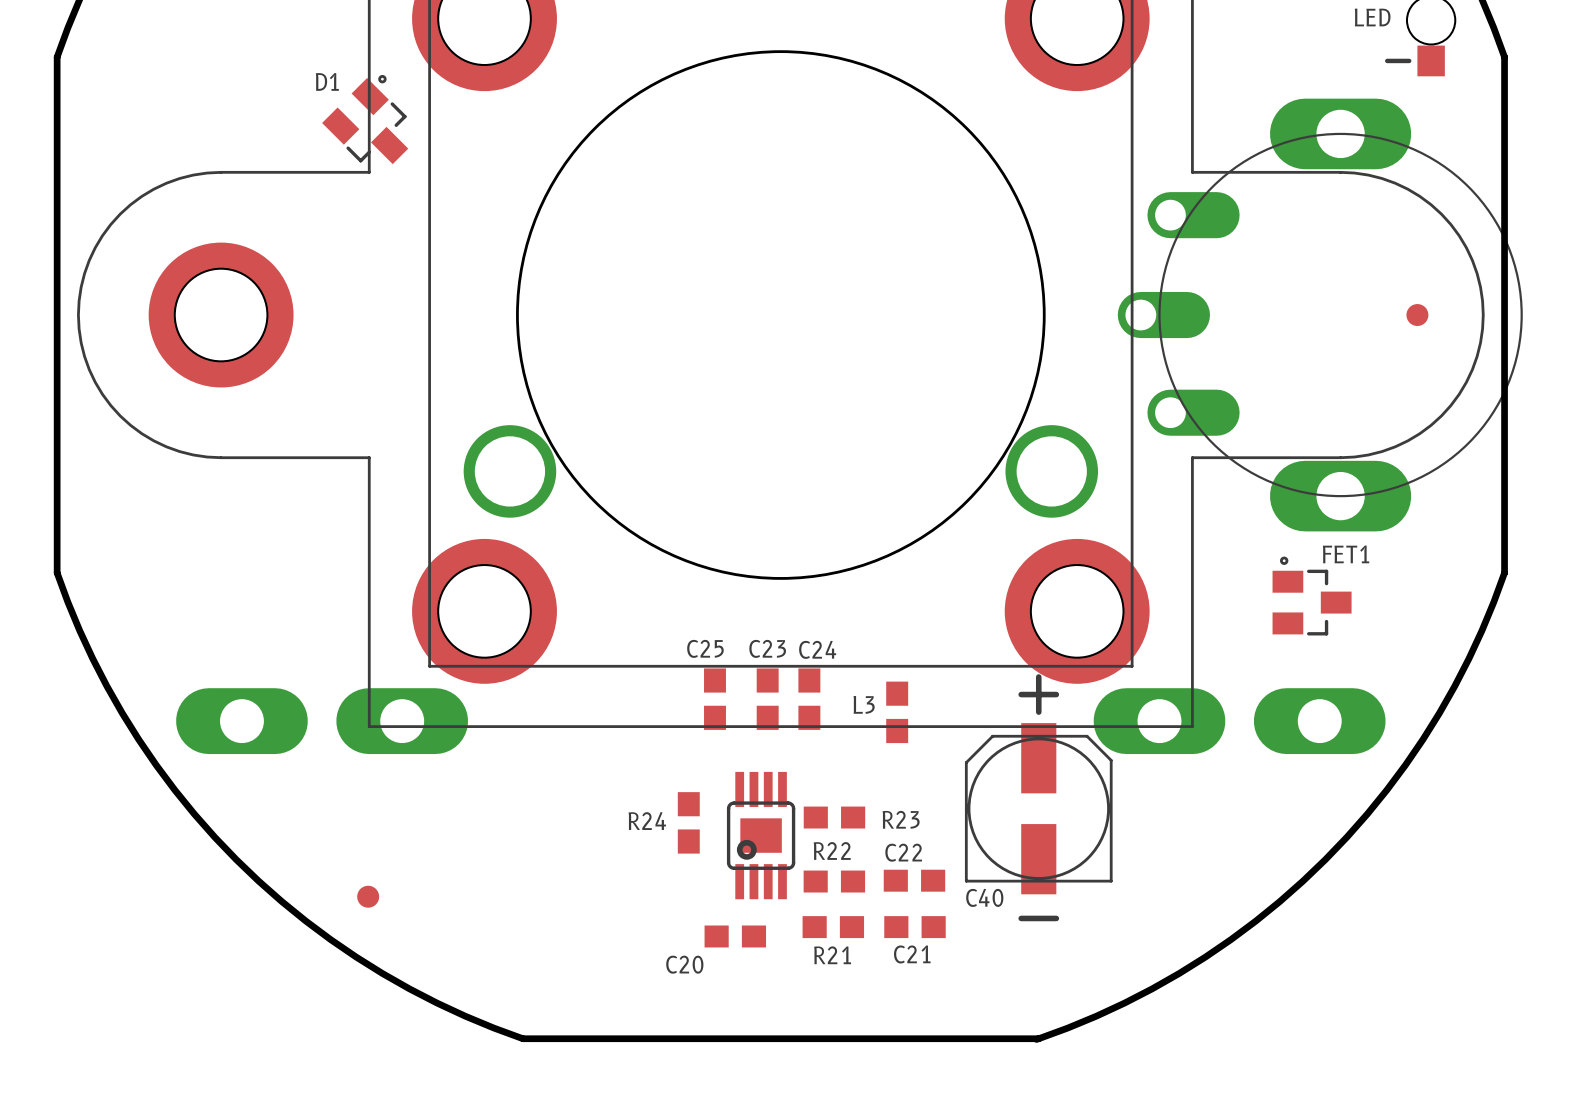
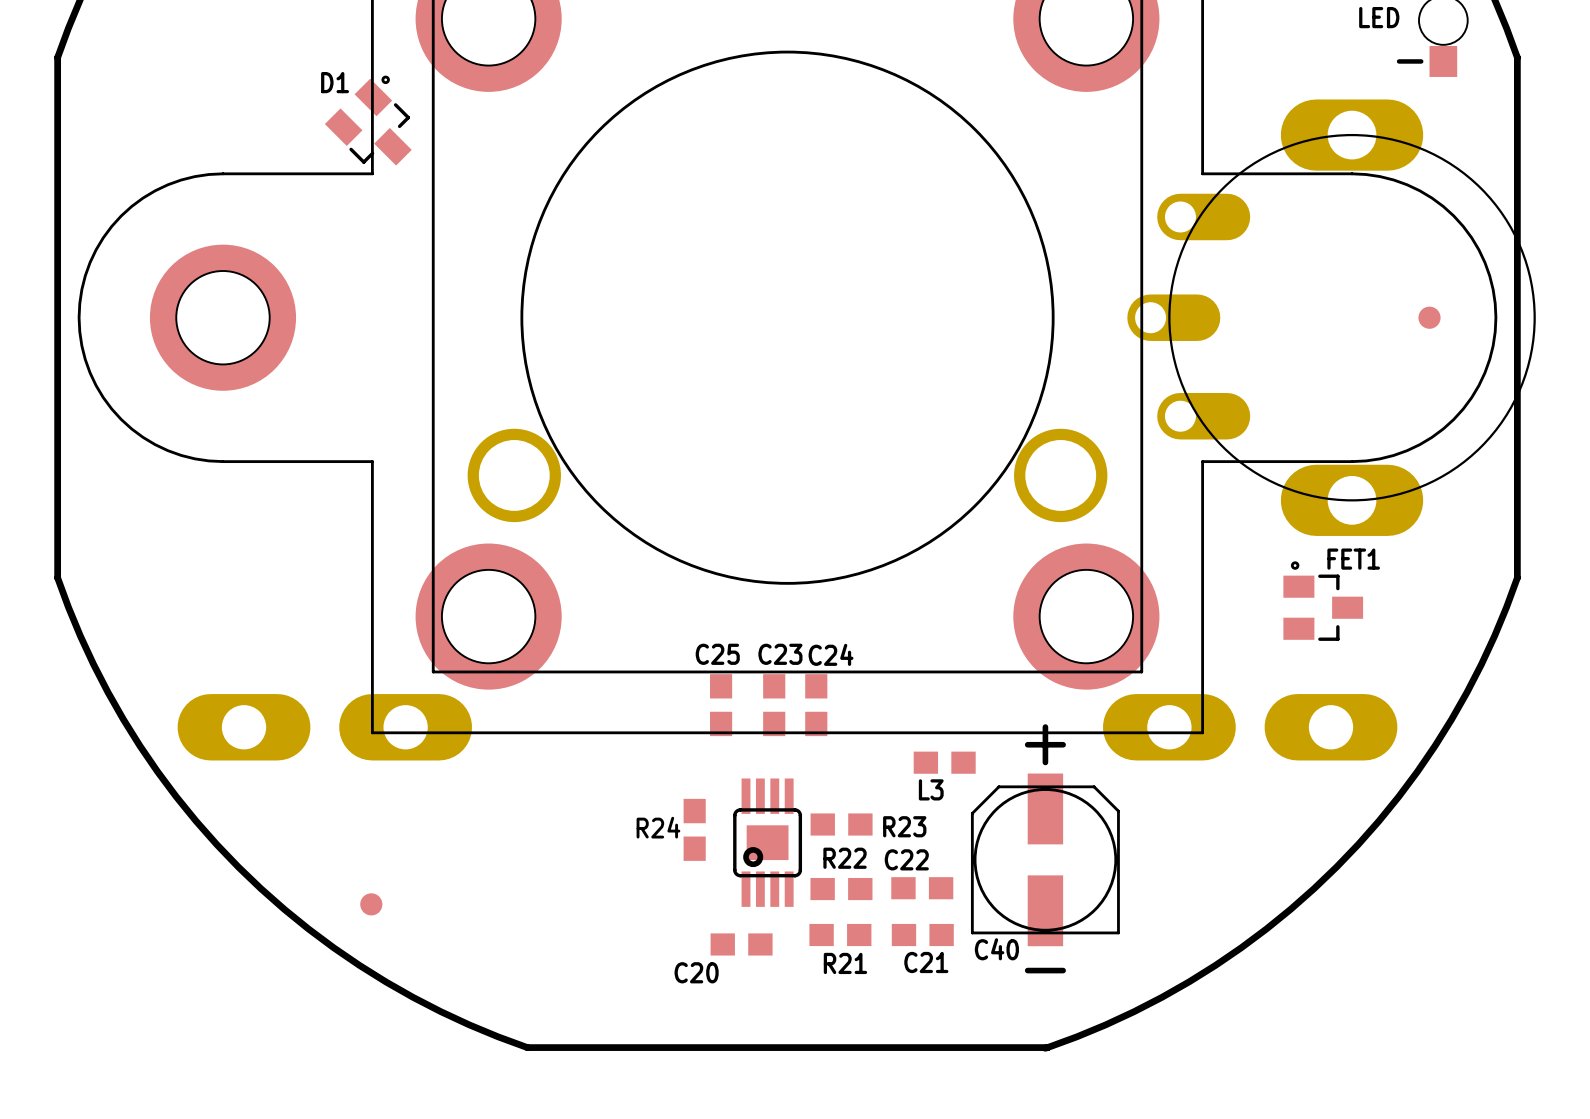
L3 rotation: 0° (897, 712) -> 90° clockwise (944, 762)
L3 position: (897, 712) -> (944, 762)
C40 position: (1038, 797) -> (1045, 848)

